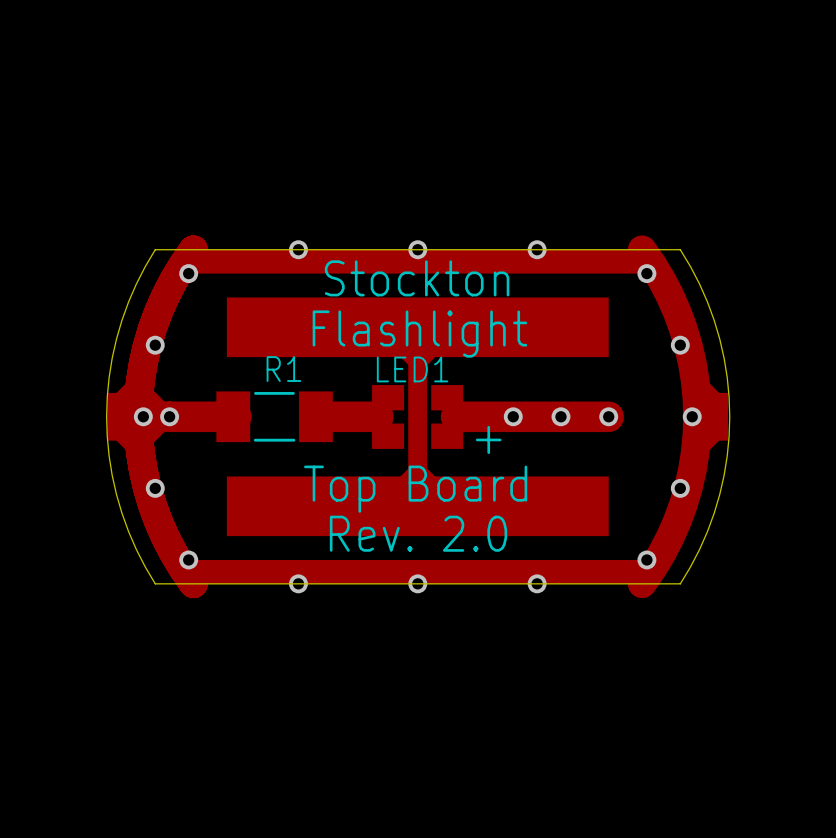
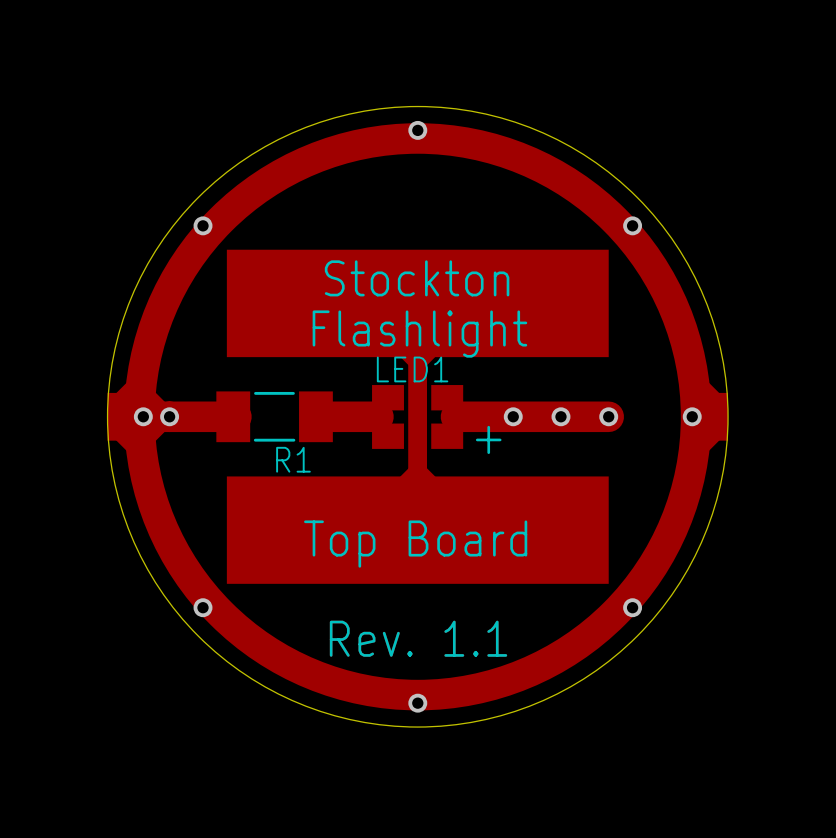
round board edge: none -> [107, 106, 729, 728]
drawing: none -> [124, 123, 712, 711]
via: none -> (417, 130)
via: none -> (203, 225)
via: none -> (632, 225)
board edge: (155, 249) (680, 249) (699, 283) (719, 339) (727, 377) (729, 416) (727, 455) (719, 494) (699, 549) (680, 583) (155, 583) (128, 531) (116, 494) (109, 455) (106, 416) (109, 377) (116, 339) (128, 302) (155, 249) -> none
drawing: [188, 249, 647, 274] -> none
track: (193, 249) (173, 279) (152, 328) (140, 381) (138, 416) (140, 452) (152, 504) (173, 553) (193, 583) -> none
track: (193, 249) (173, 279) (152, 328) (140, 381) (138, 416) (140, 452) (152, 504) (173, 553) (193, 583) -> none
track: (193, 249) (173, 279) (152, 328) (140, 381) (138, 416) (140, 452) (152, 504) (173, 553) (193, 583) -> none
via: (298, 249) -> none
via: (417, 249) -> none
via: (537, 249) -> none
track: (642, 249) (669, 295) (683, 328) (695, 381) (697, 416) (695, 452) (683, 504) (661, 553) (642, 583) -> none
via: (188, 273) -> none
via: (646, 273) -> none
drawing: [226, 297, 609, 358] -> none
via: (155, 345) -> none
via: (680, 345) -> none
R1 name position: R1 (283, 369) -> R1 (293, 459)
drawing: [226, 476, 609, 537] -> none
via: (155, 488) -> none
via: (680, 488) -> none
text position: Top Board (415, 489) -> Top Board (415, 544)
text: Rev. 2.0 (418, 533) -> none
drawing: [183, 559, 657, 584] -> none
via: (188, 559) -> none
via: (646, 559) -> none
via: (298, 583) -> none
via: (417, 583) -> none
via: (537, 583) -> none
via: none -> (203, 607)
via: none -> (632, 607)
text: none -> Rev. 1.1 (418, 638)
via: none -> (417, 703)

